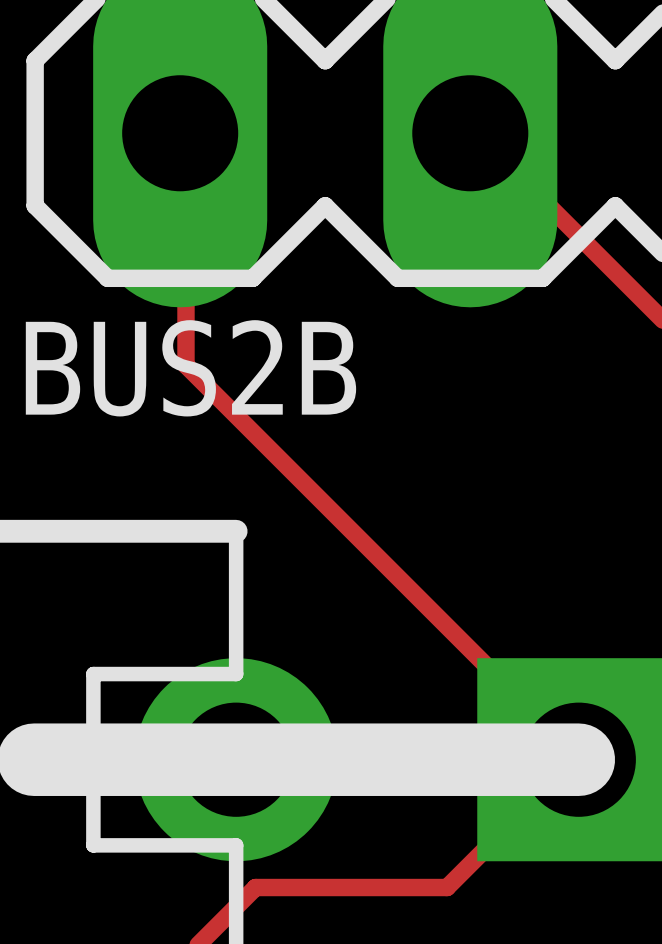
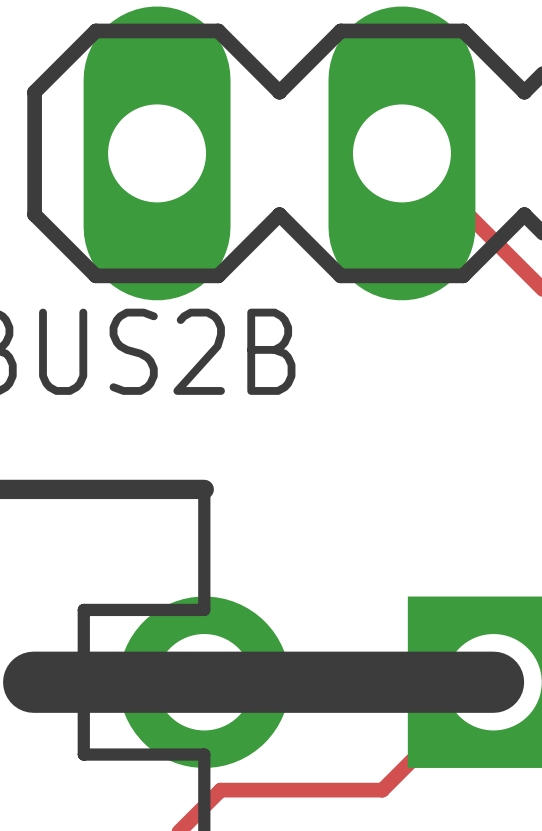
track: (180, 133) (185, 139) (185, 365) (578, 759) -> none

